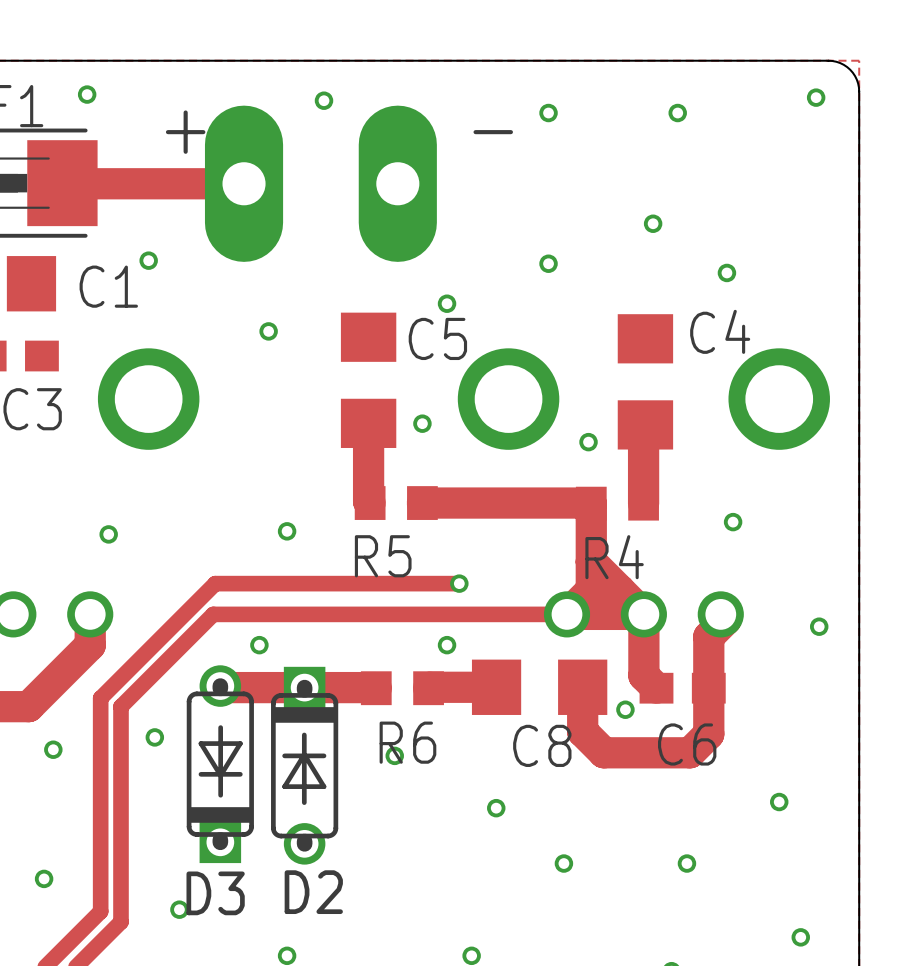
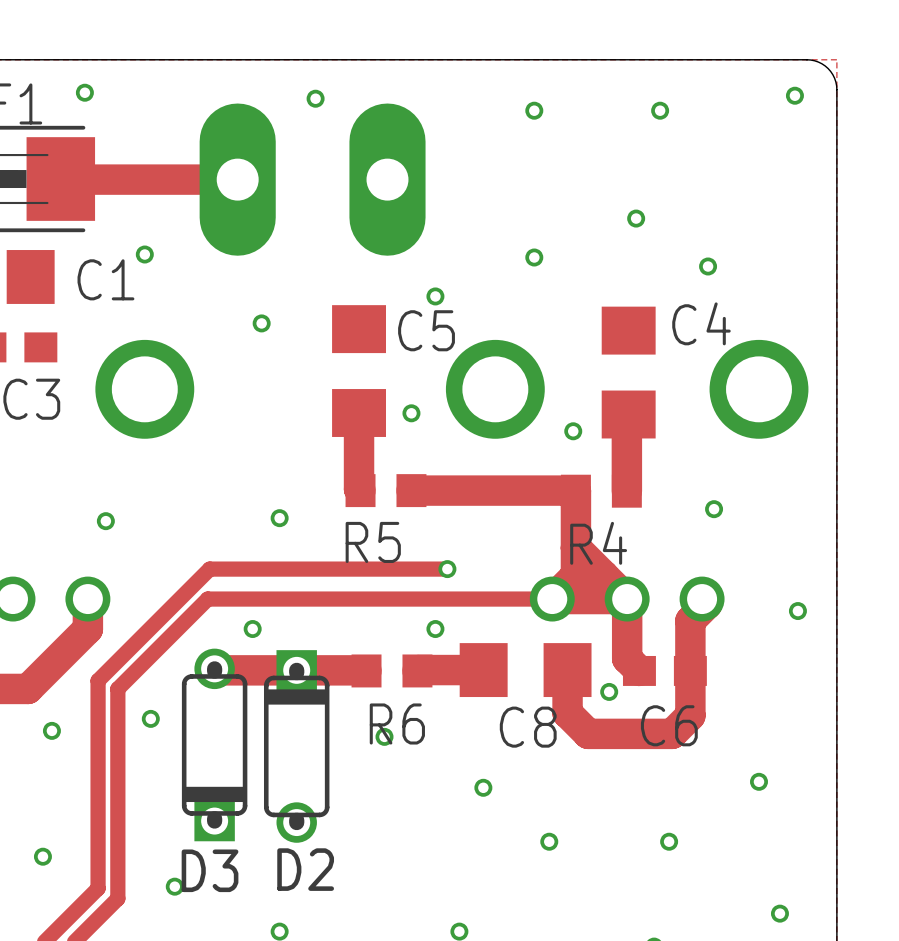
text: + (185, 132) -> none
text: - (493, 132) -> none
line: (220, 727) (220, 795) -> none
line: (304, 734) (304, 802) -> none
line: (200, 743) (240, 743) (220, 775) (200, 743) -> none
line: (304, 754) (324, 786) (284, 786) (304, 754) -> none
line: (284, 755) (324, 755) -> none
line: (200, 774) (240, 774) -> none

